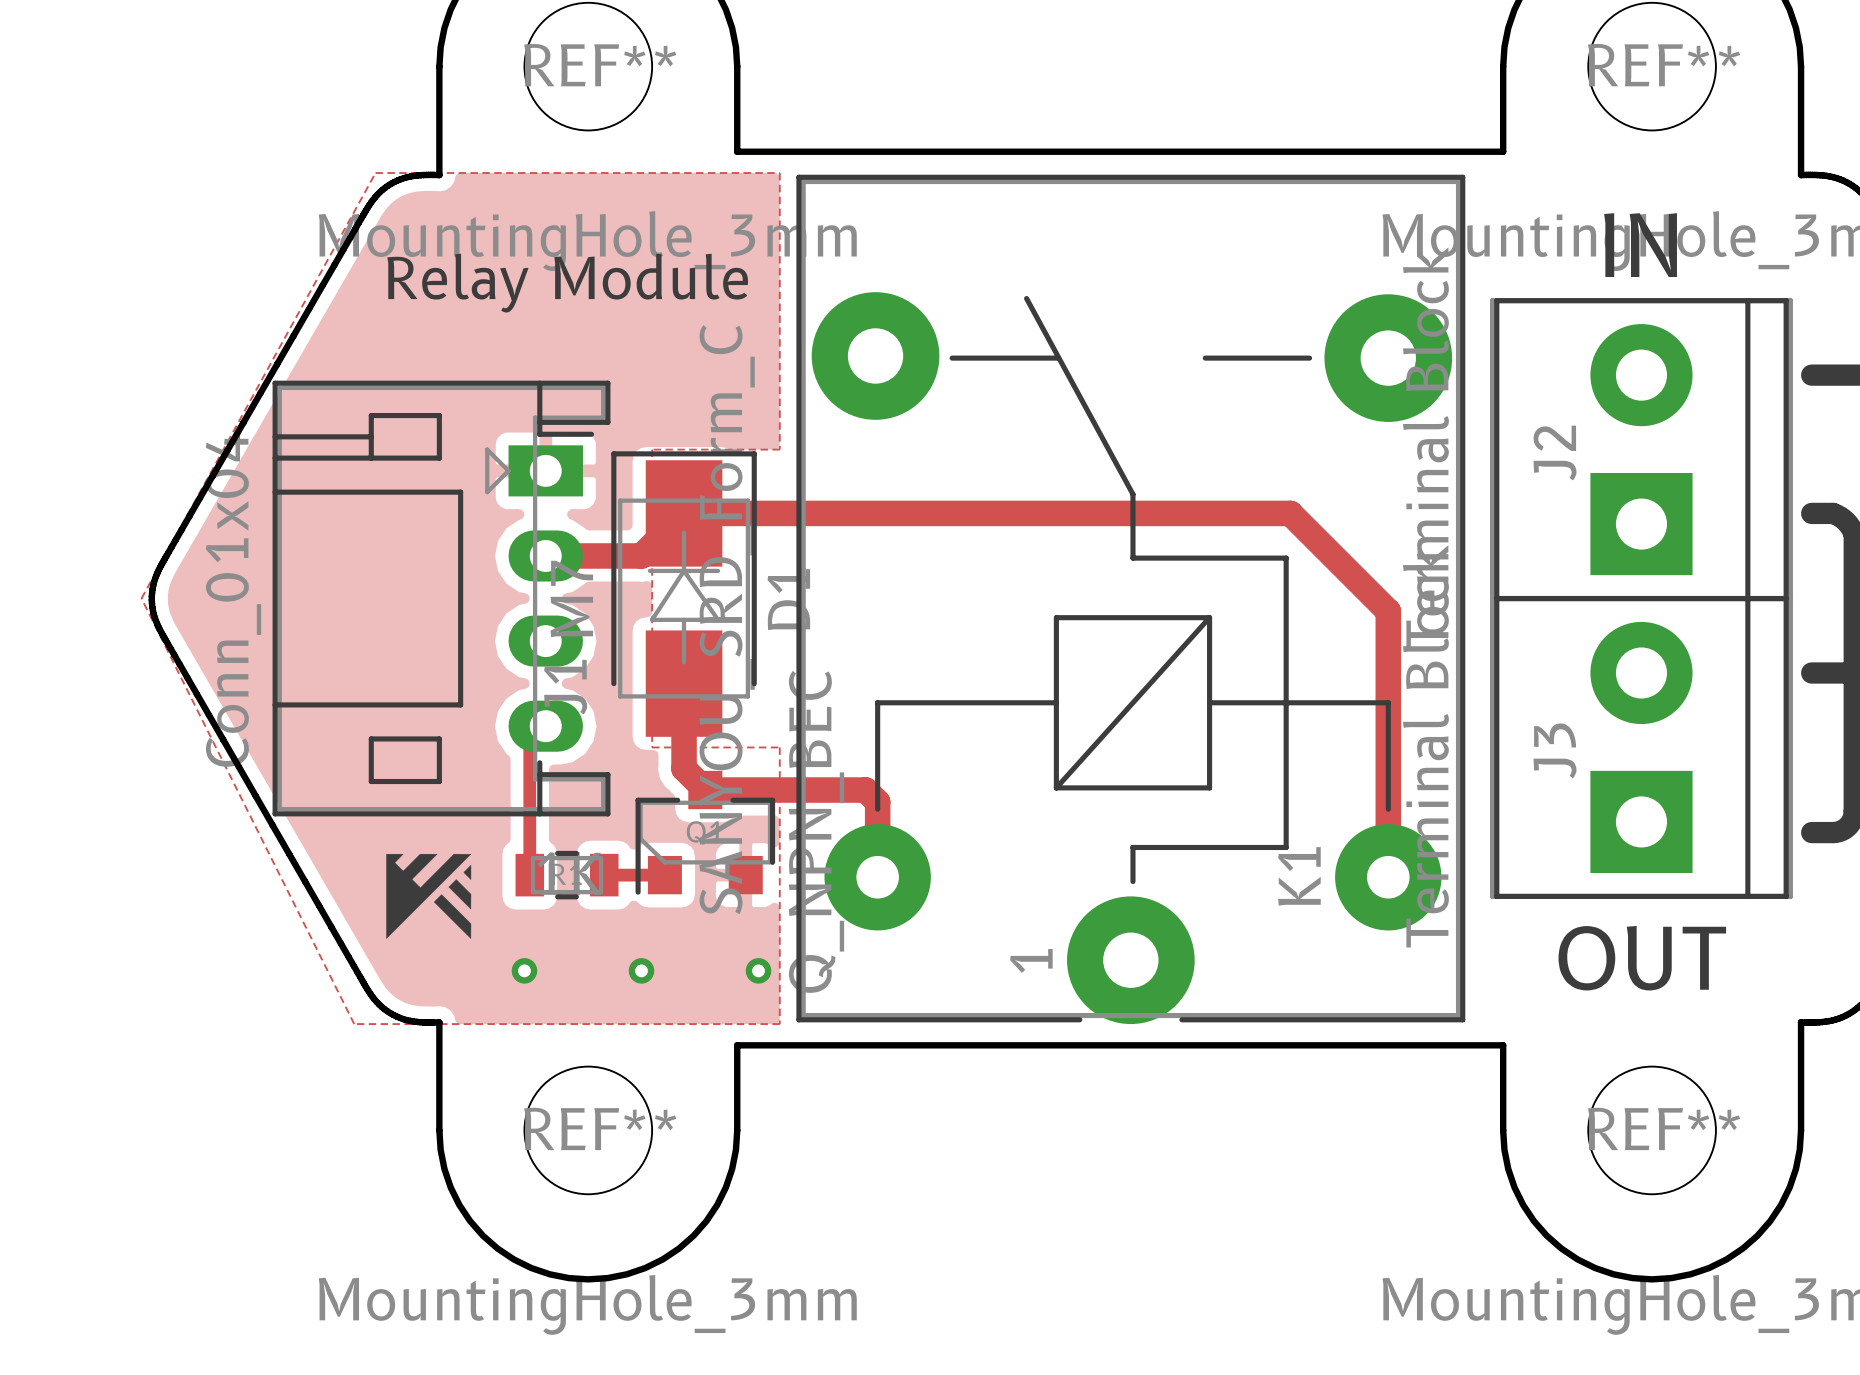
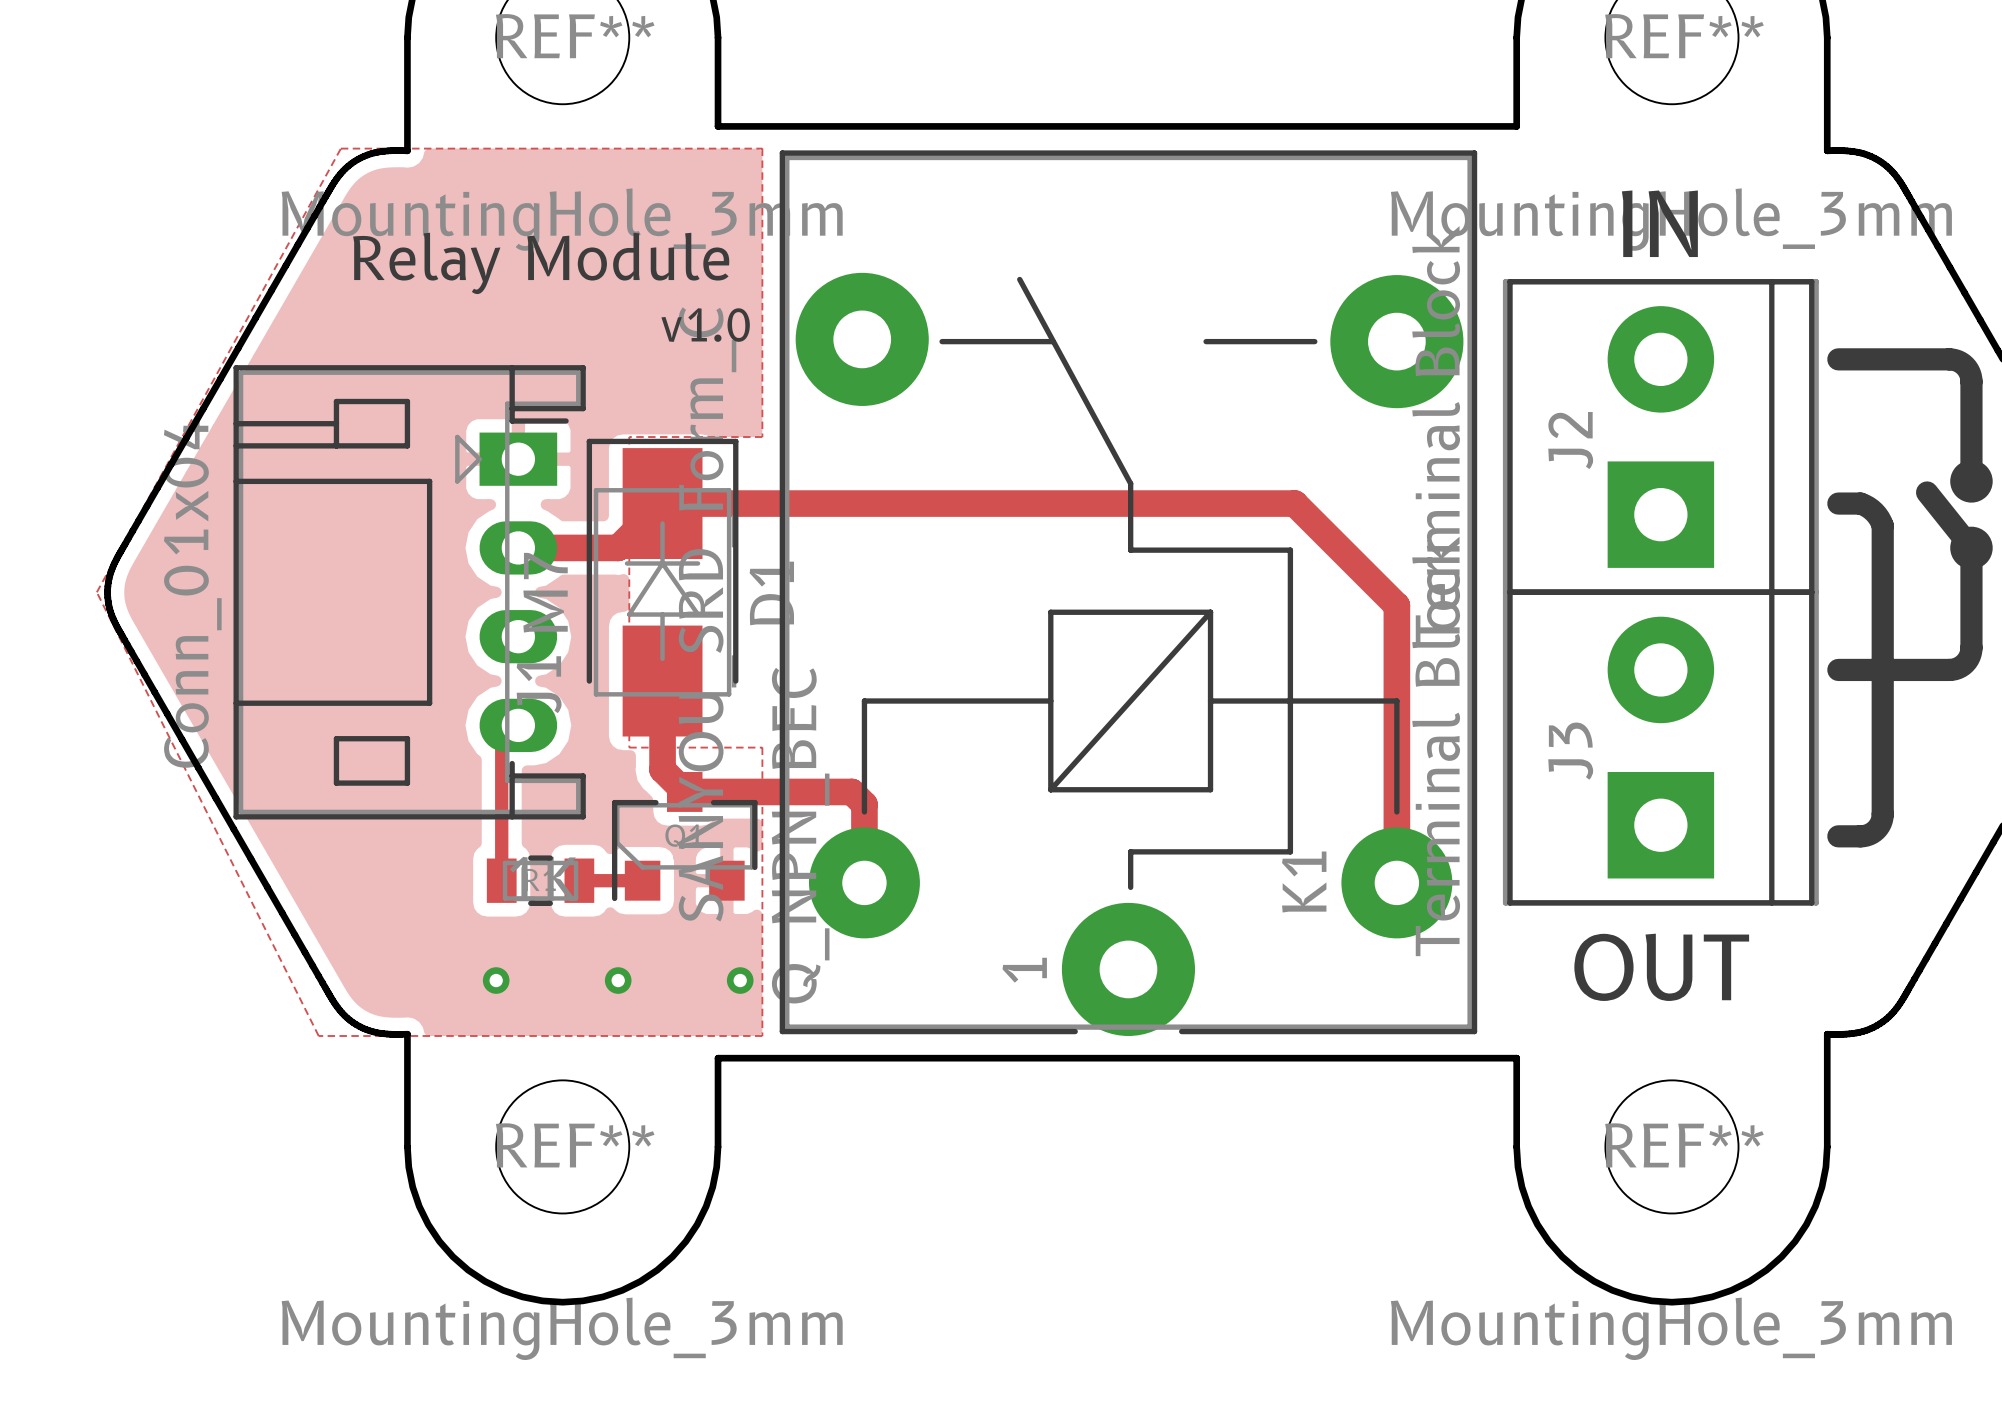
text: none -> v1.0 (705, 325)
drawing: [386, 853, 472, 939] -> none

